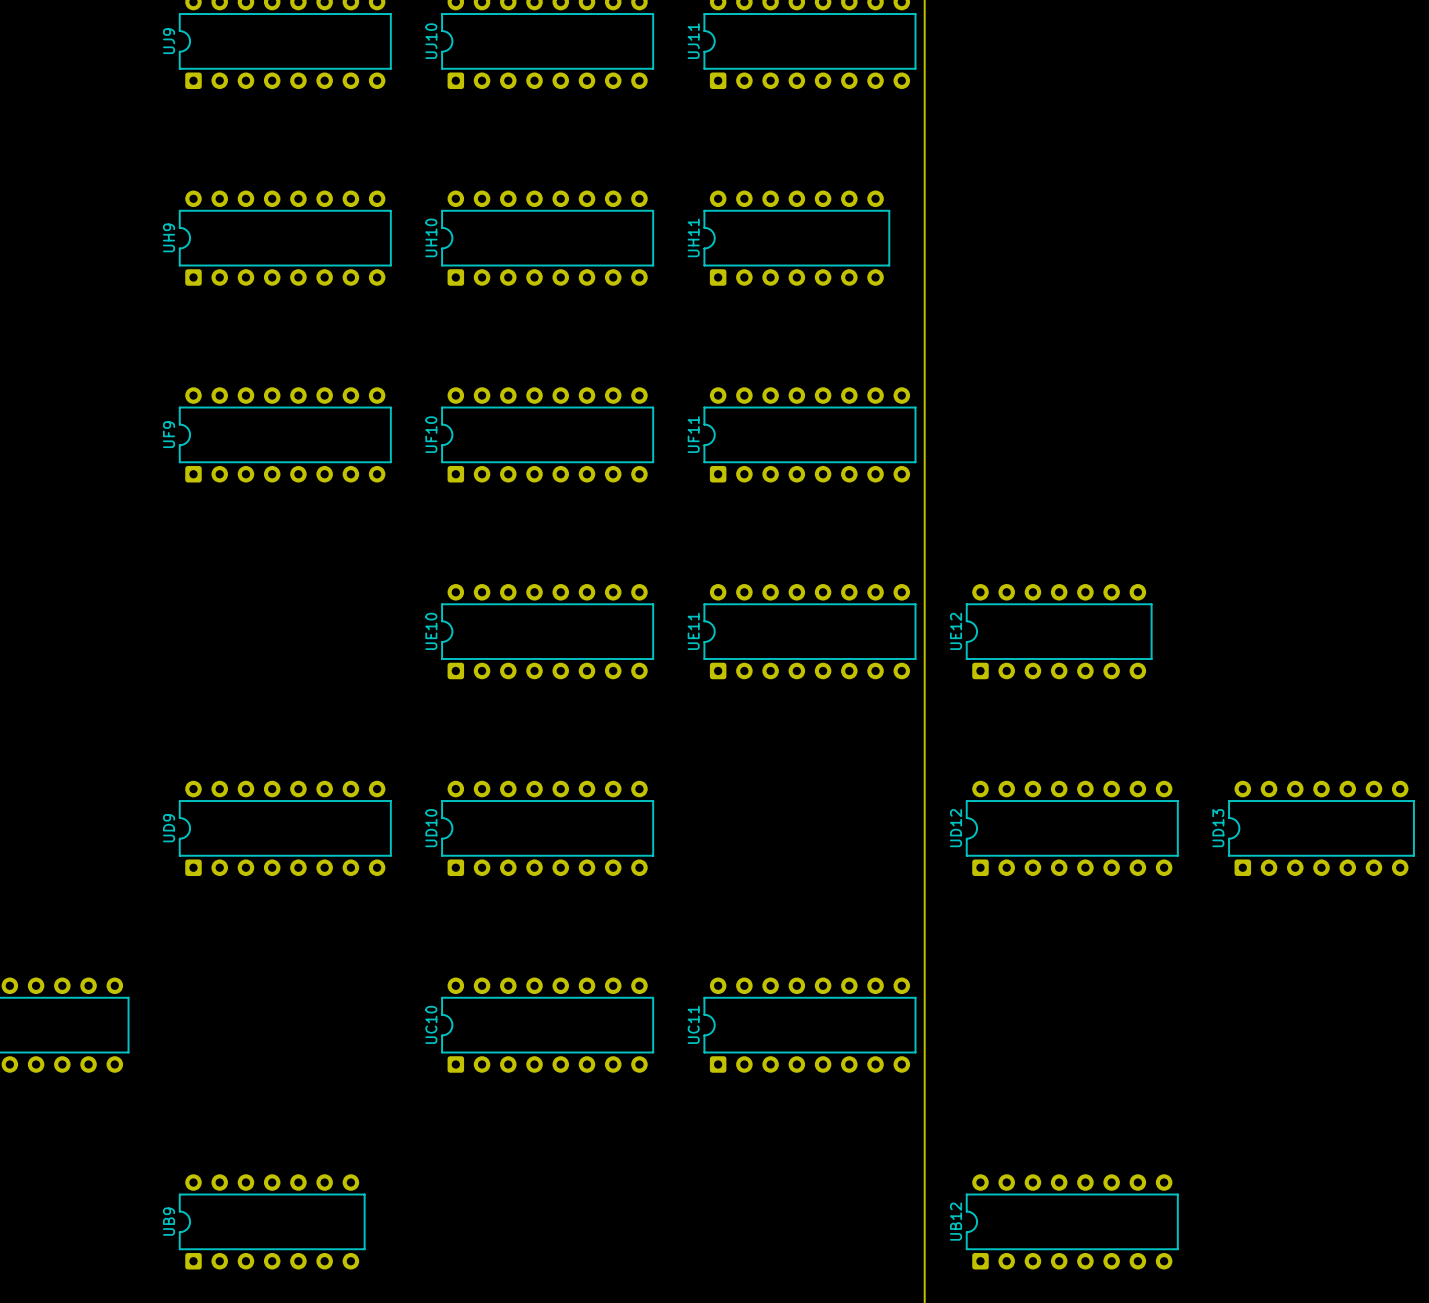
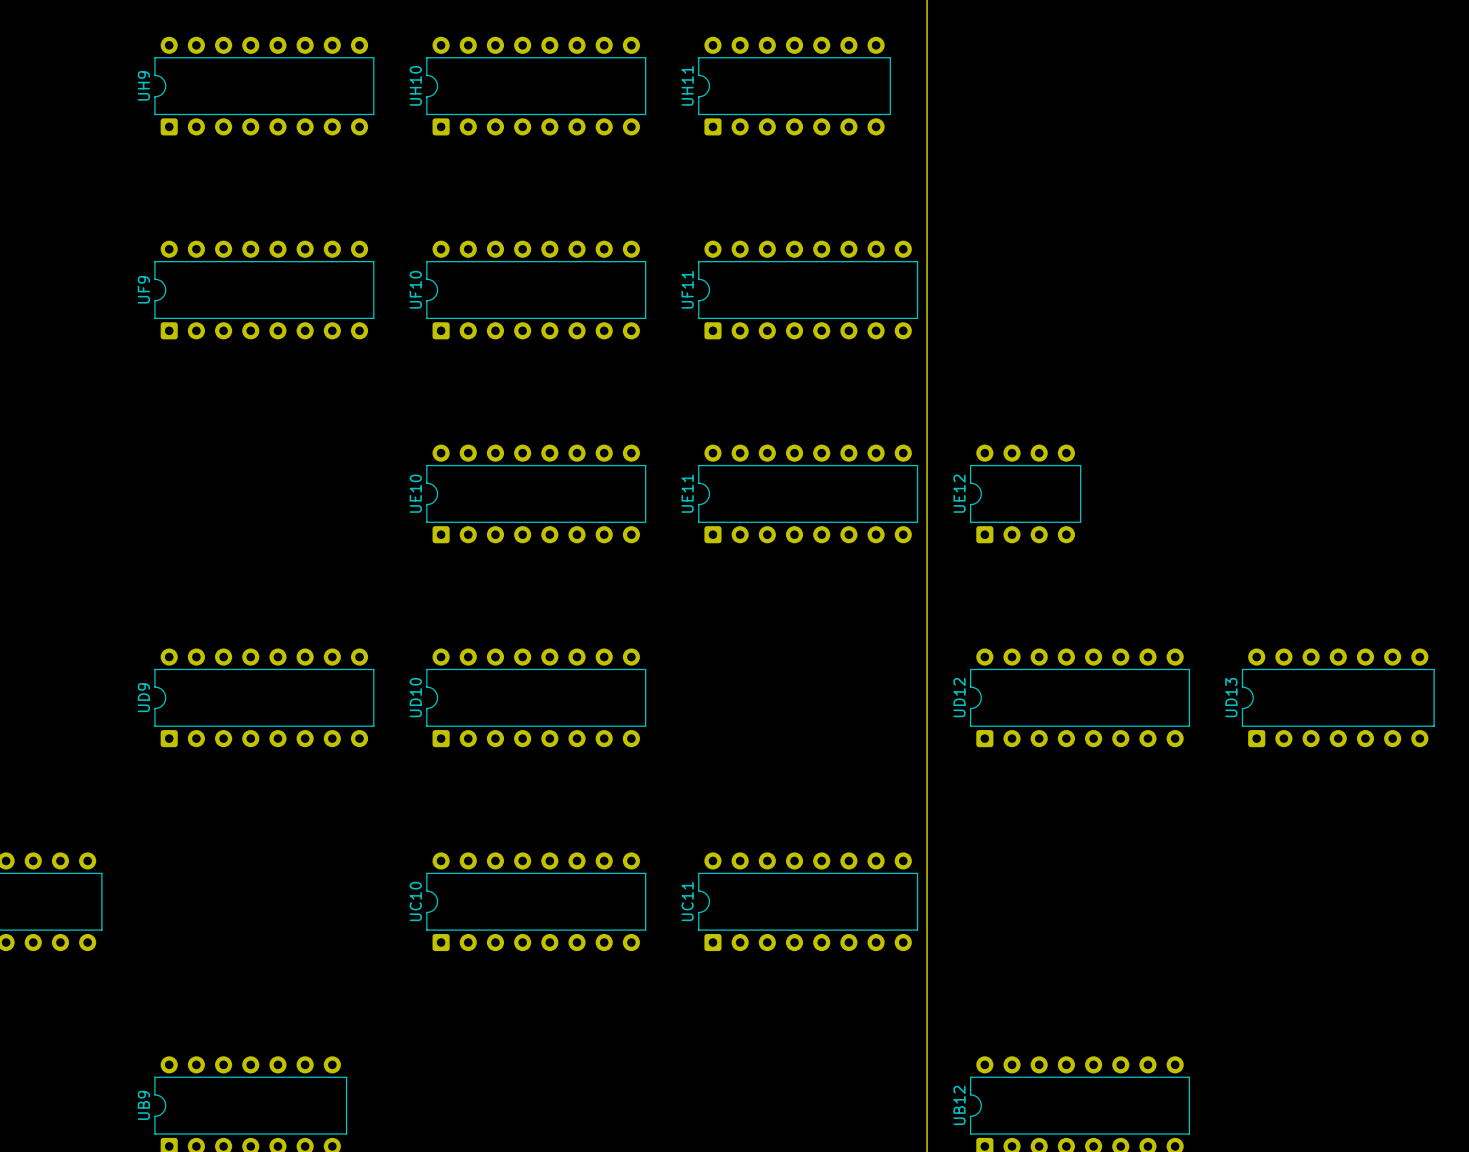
UE12 footprint: [966, 584, 1153, 680] -> [969, 444, 1082, 544]

